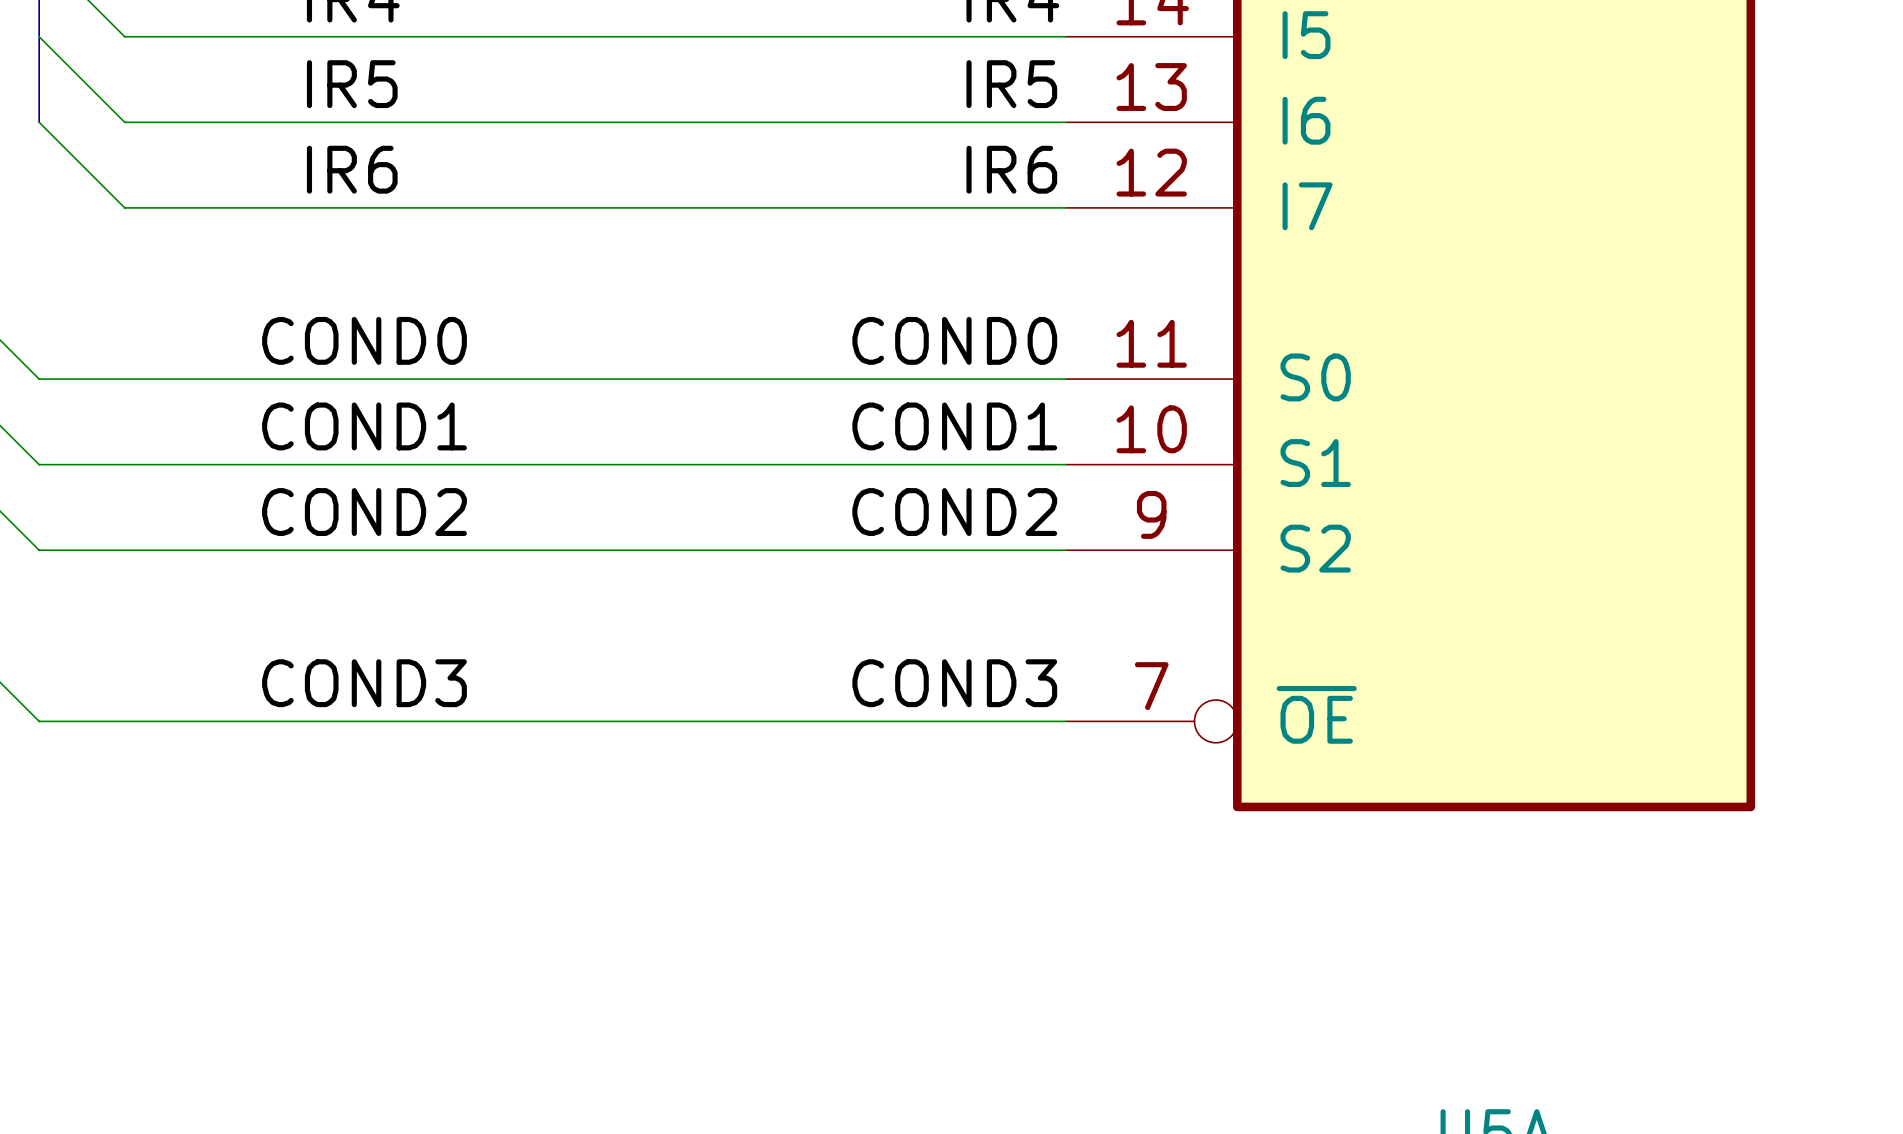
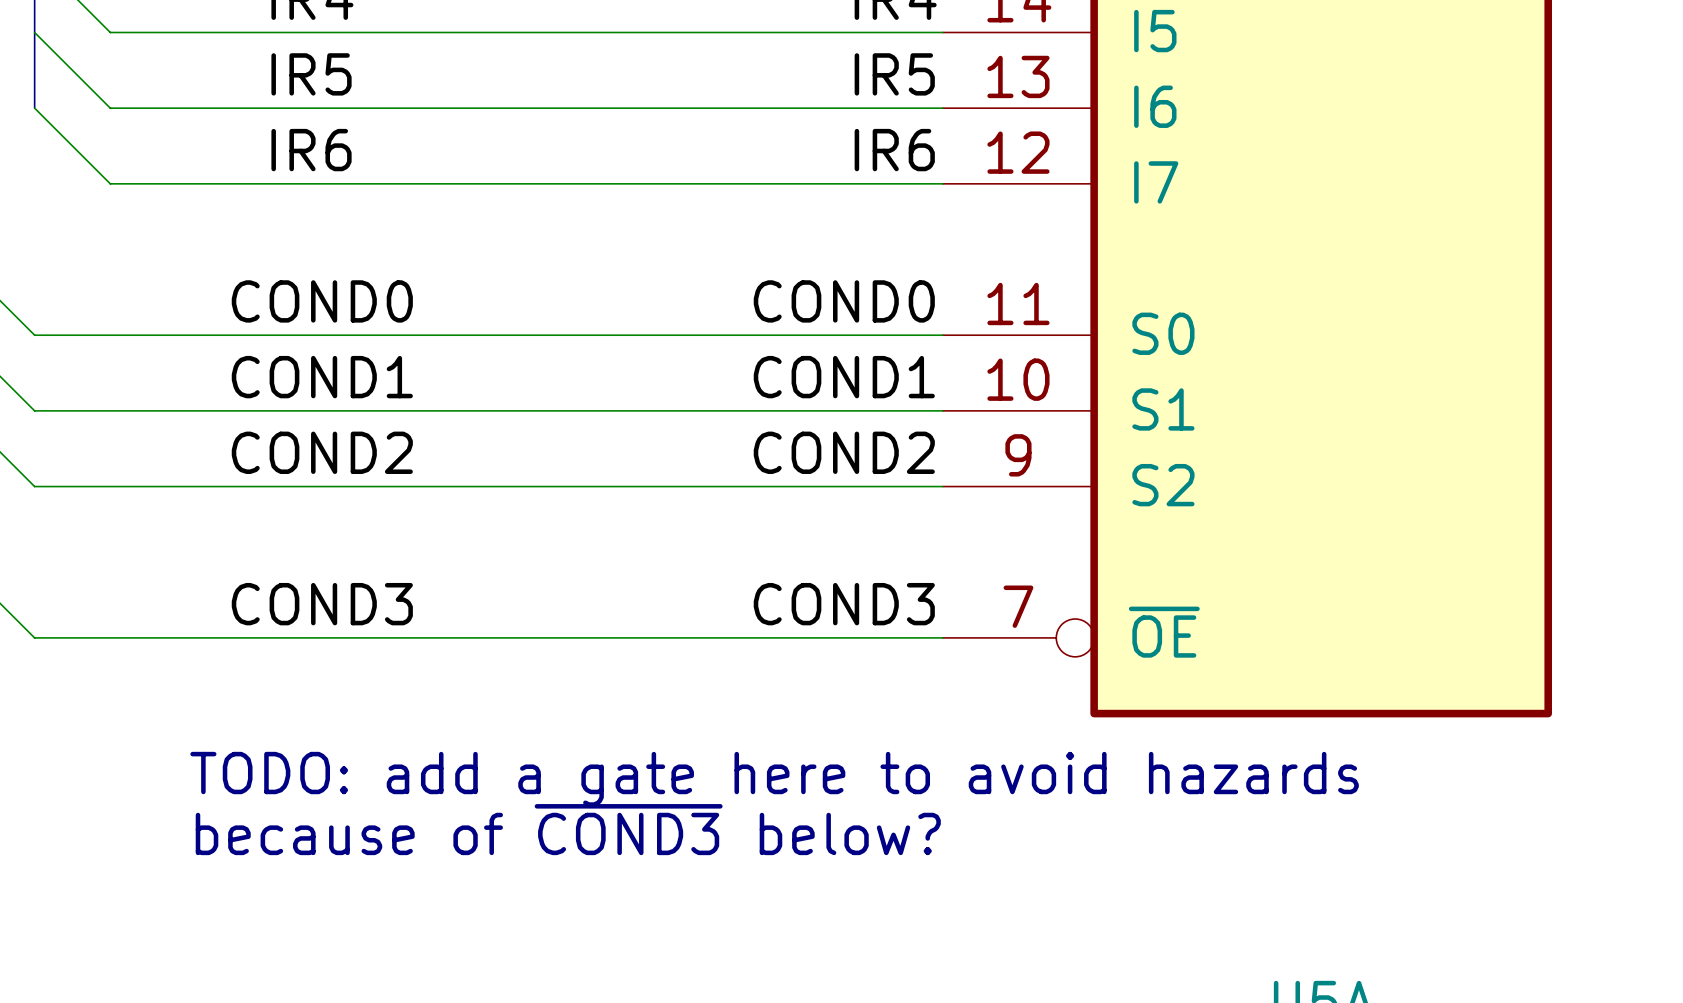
text: none -> TODO: add a gate here to avoid hazards (774, 779)
text: none -> because of ~{COND3} below? (568, 829)

